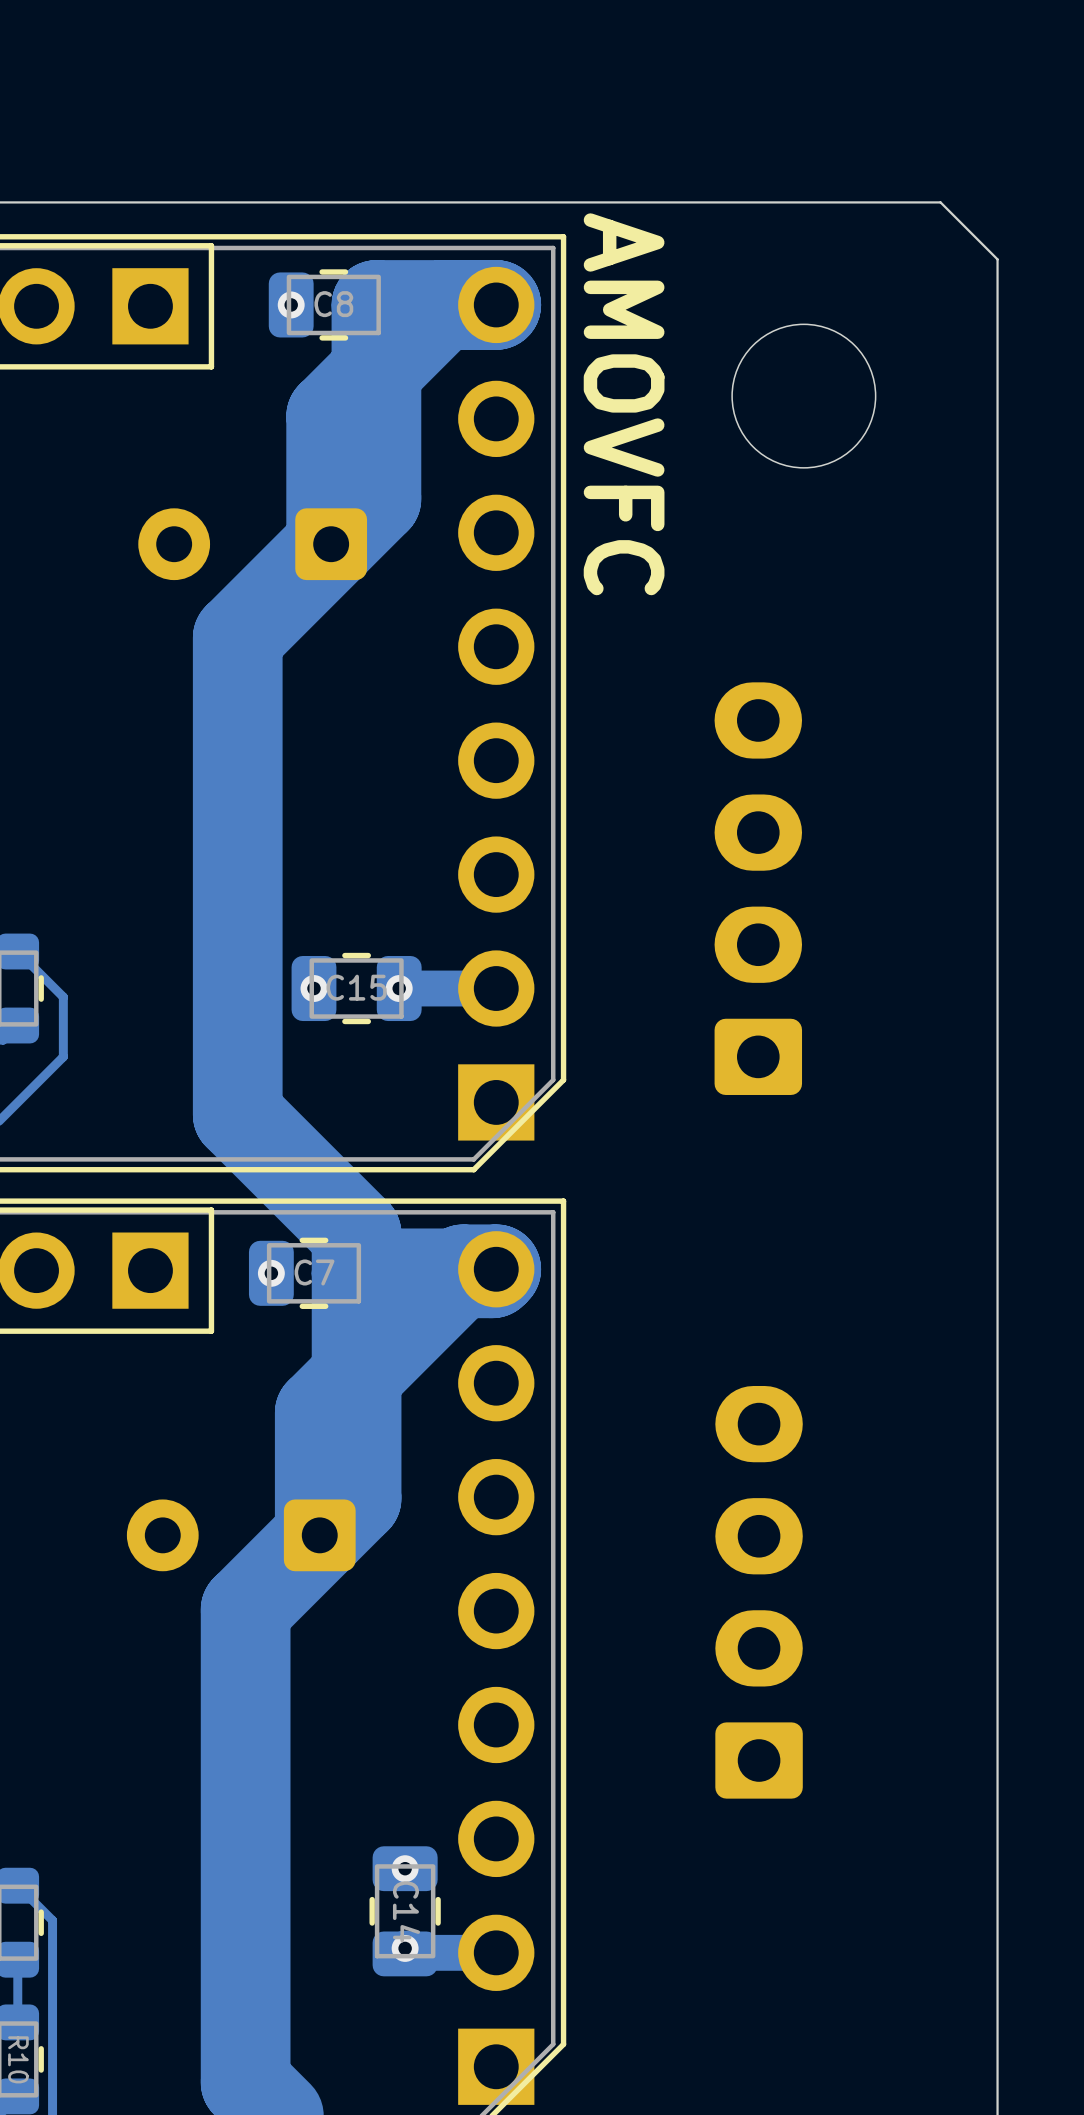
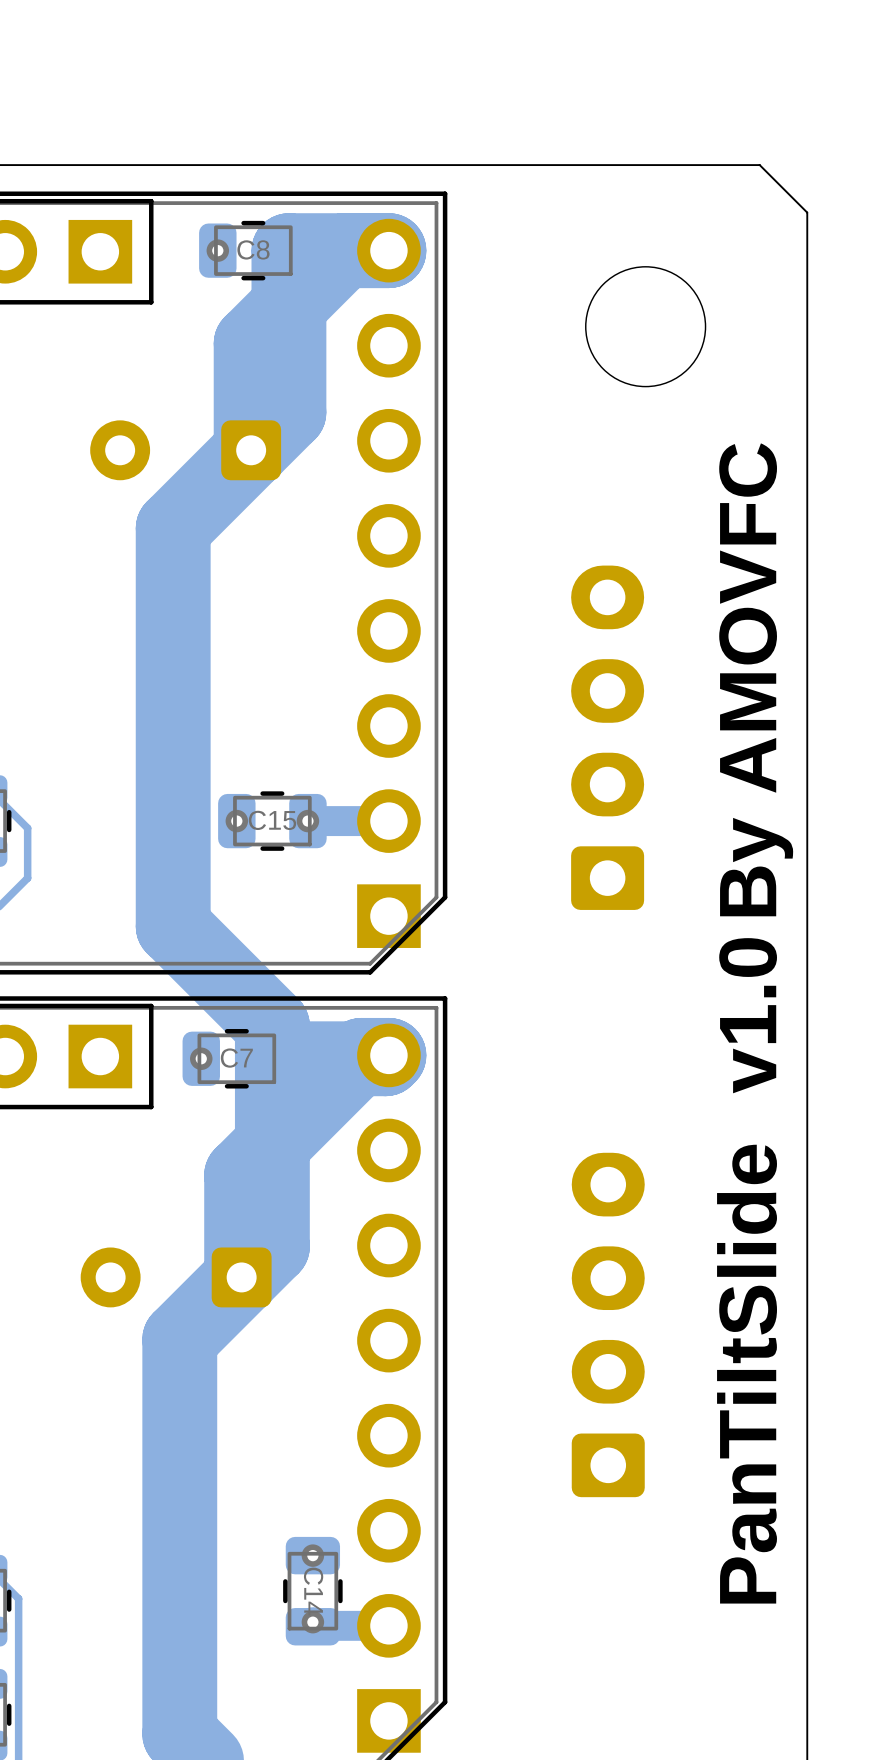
text: AMOVFC (624, 404) -> none
text: none -> By AMOVFC (756, 679)
text: none -> v1.0 (748, 1015)
text: none -> PanTiltSlide (747, 1374)

